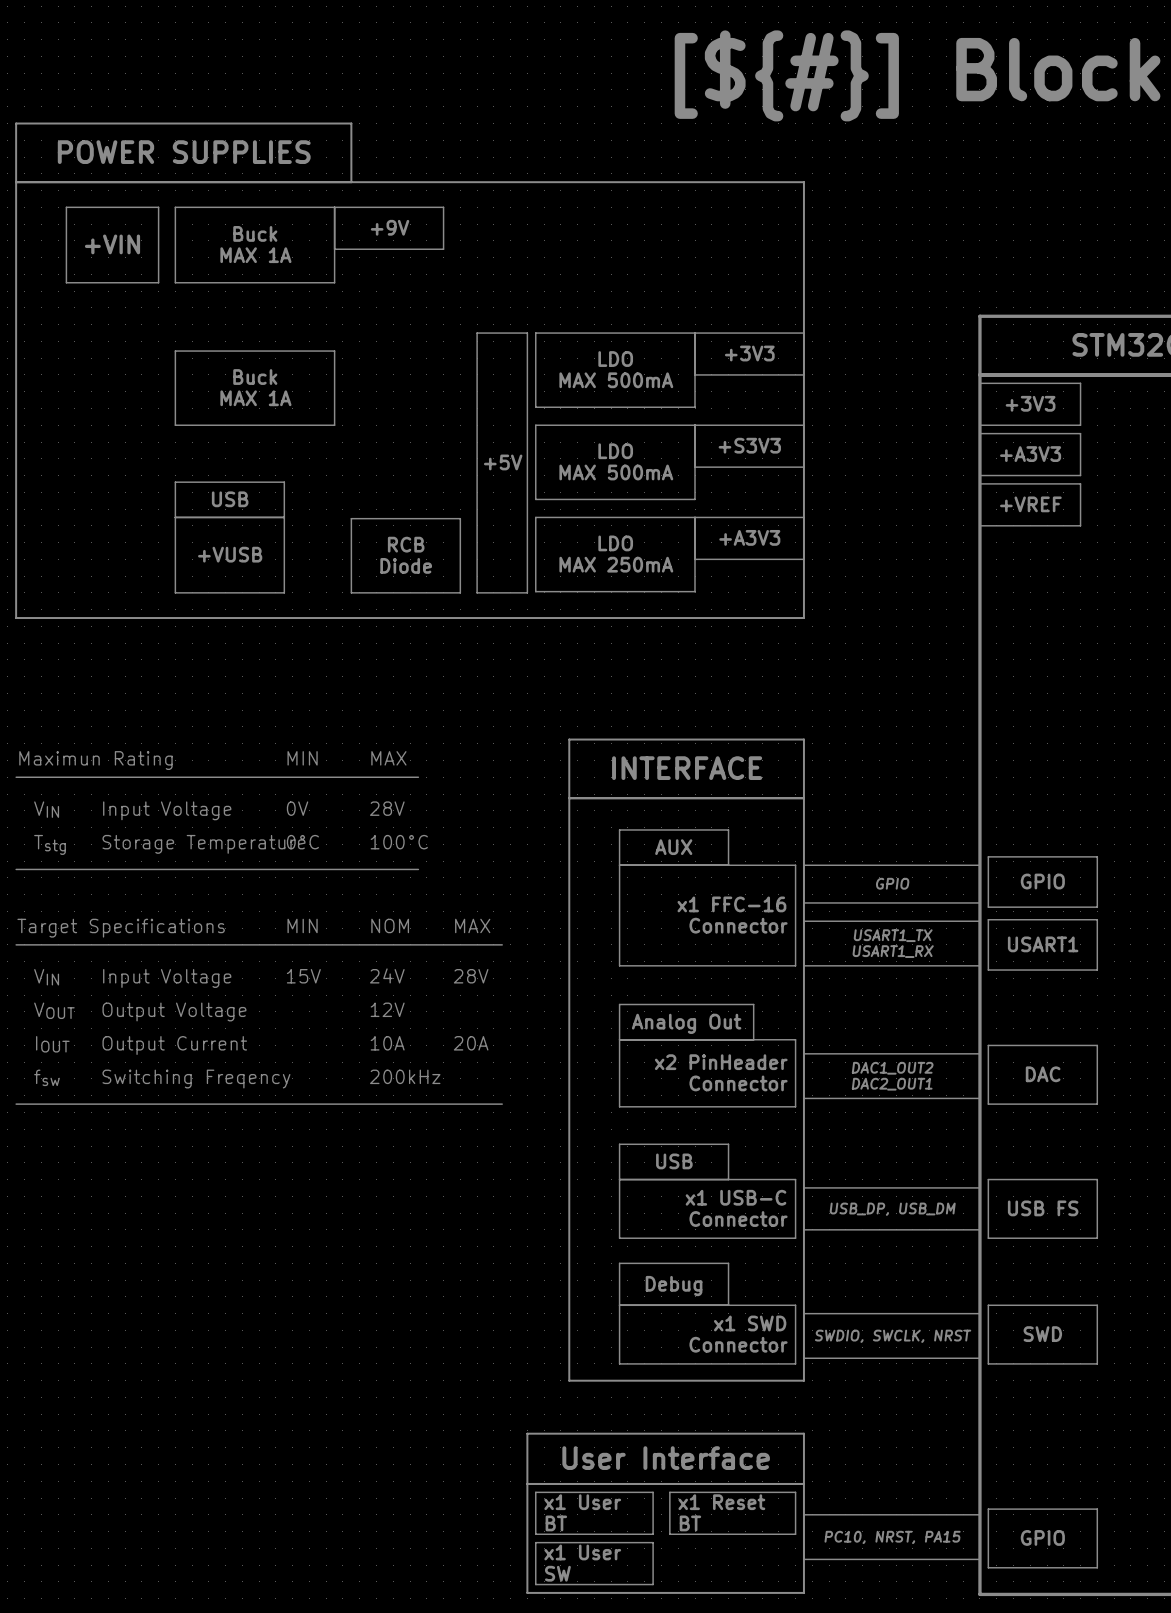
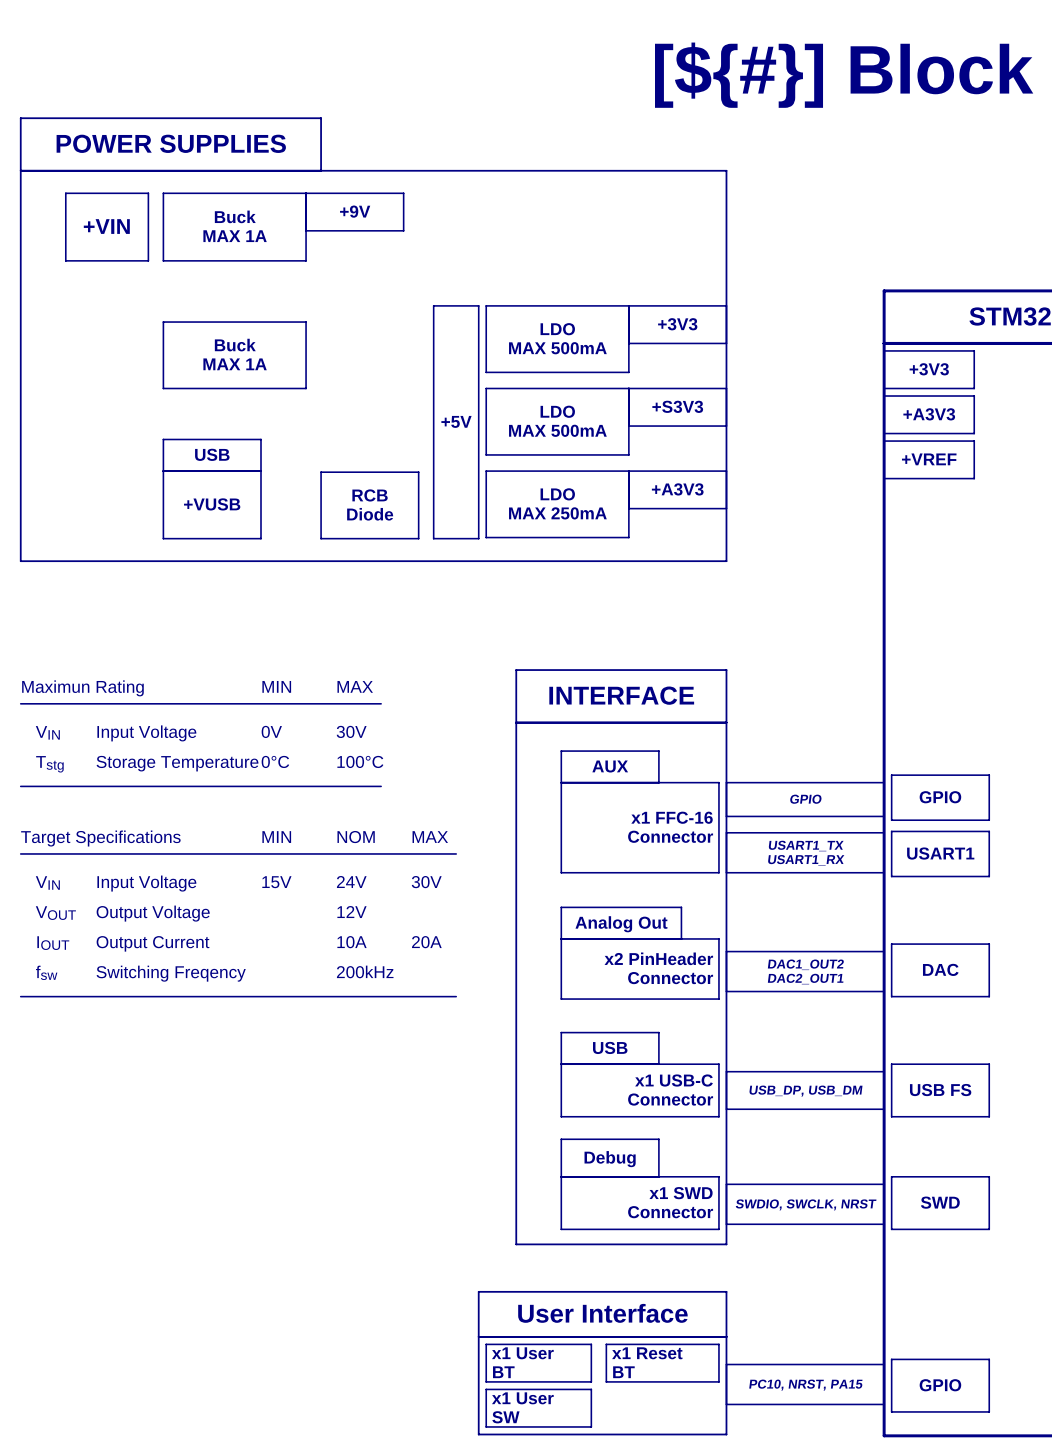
text: 28V (387, 808) -> 30V (351, 731)
text: 28V (471, 976) -> 30V (426, 882)

